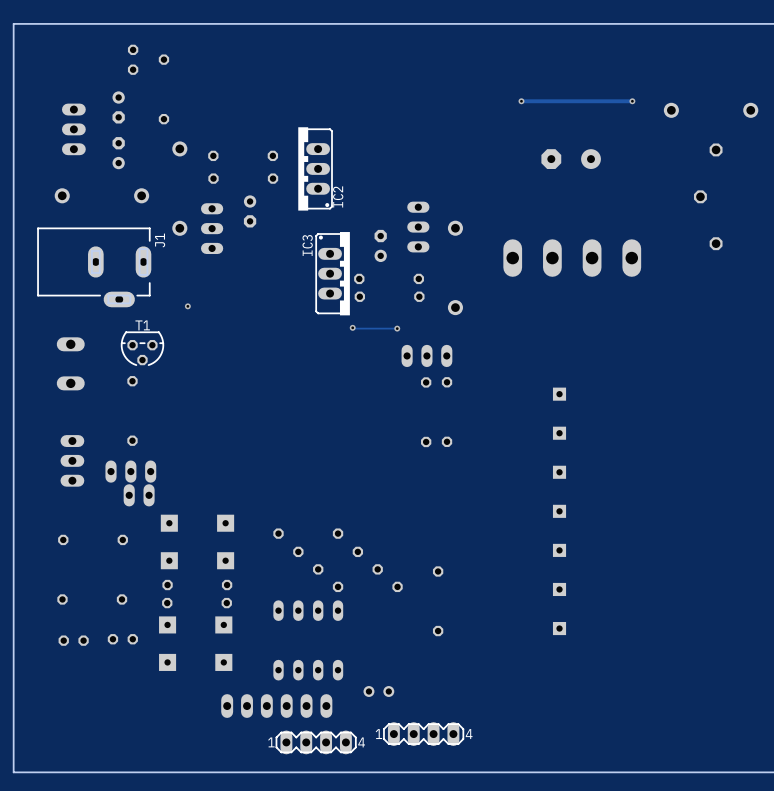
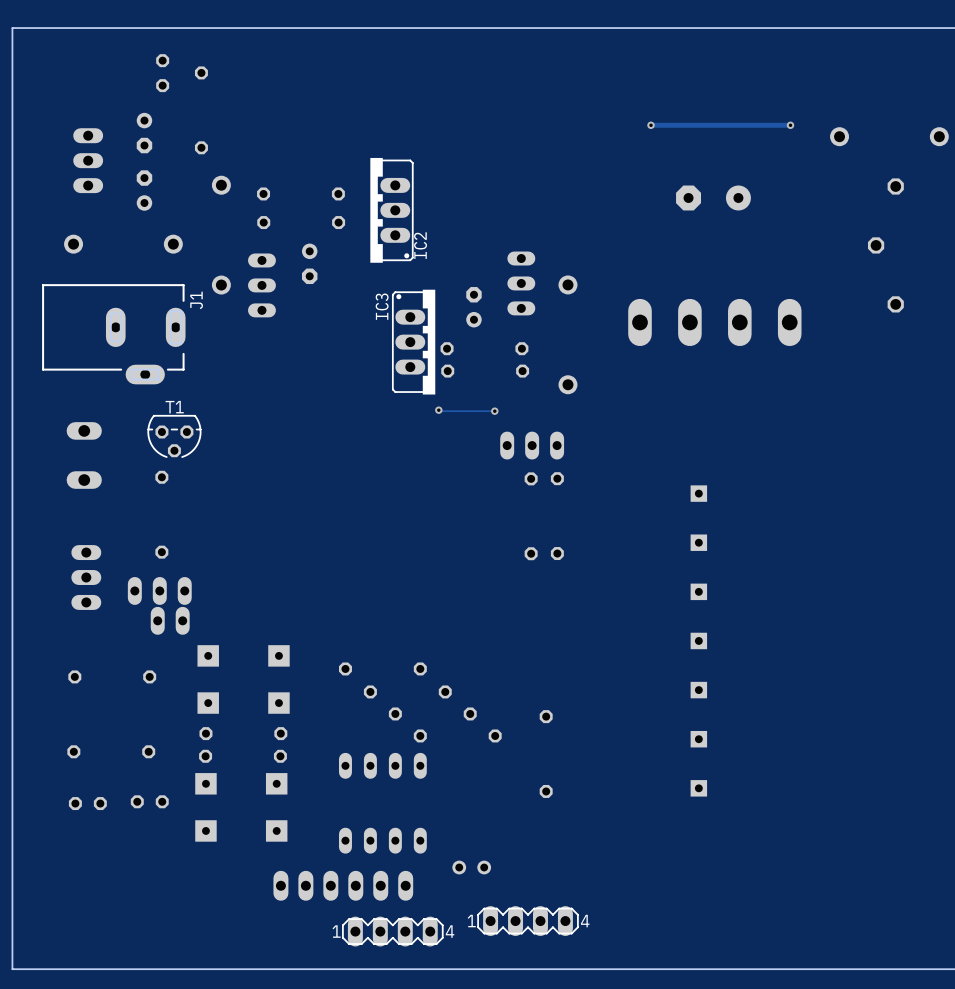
via: (187, 306) -> none

